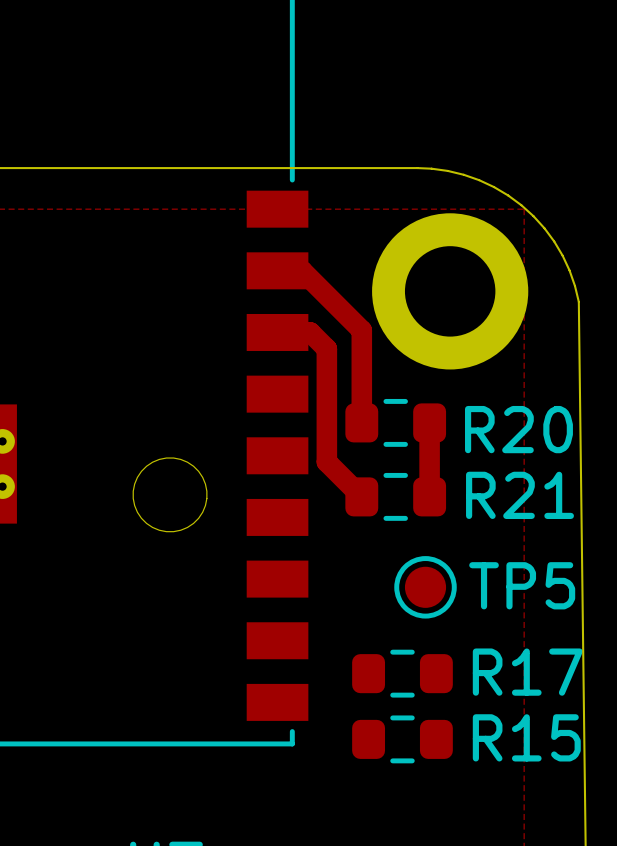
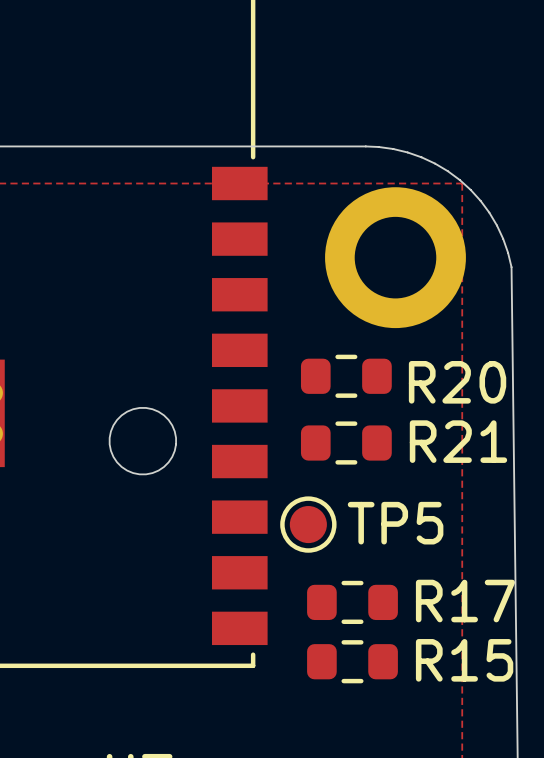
track: (277, 270) (302, 270) (361, 330) (361, 422) -> none
track: (277, 332) (310, 332) (326, 348) (326, 461) (361, 496) -> none
track: (429, 422) (429, 496) -> none
TP5 position: (425, 587) -> (308, 524)

